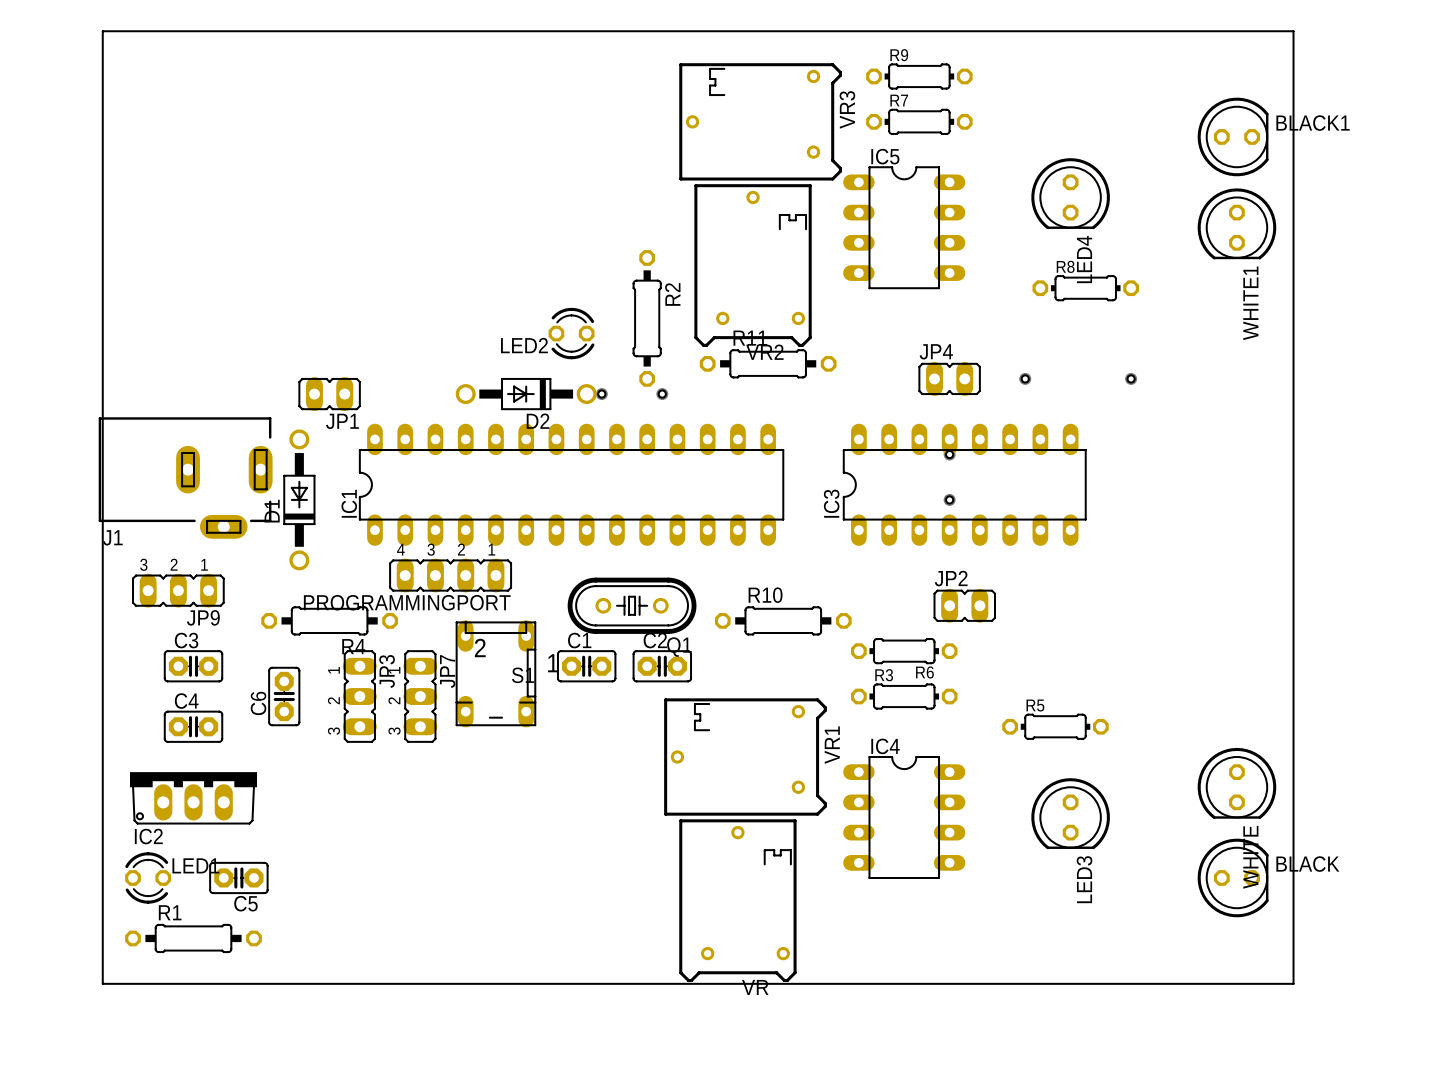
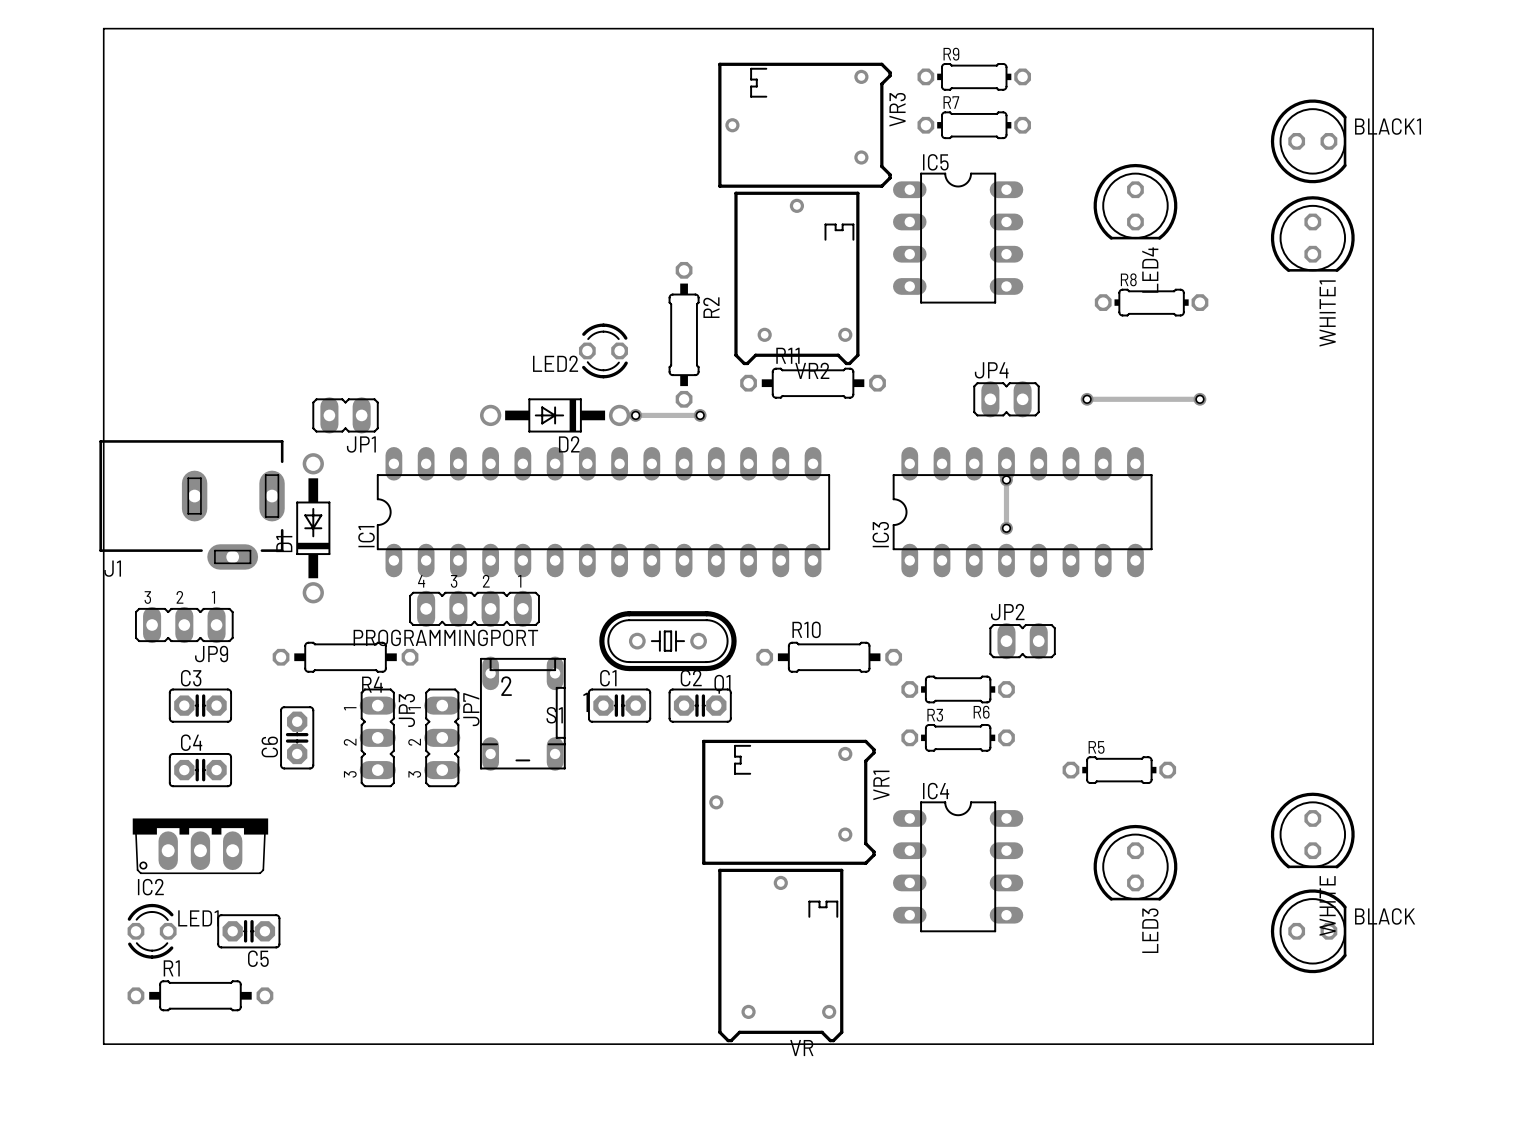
track: none -> (1087, 399) (1199, 399)
track: none -> (635, 415) (700, 415)
track: none -> (1006, 479) (1006, 528)

